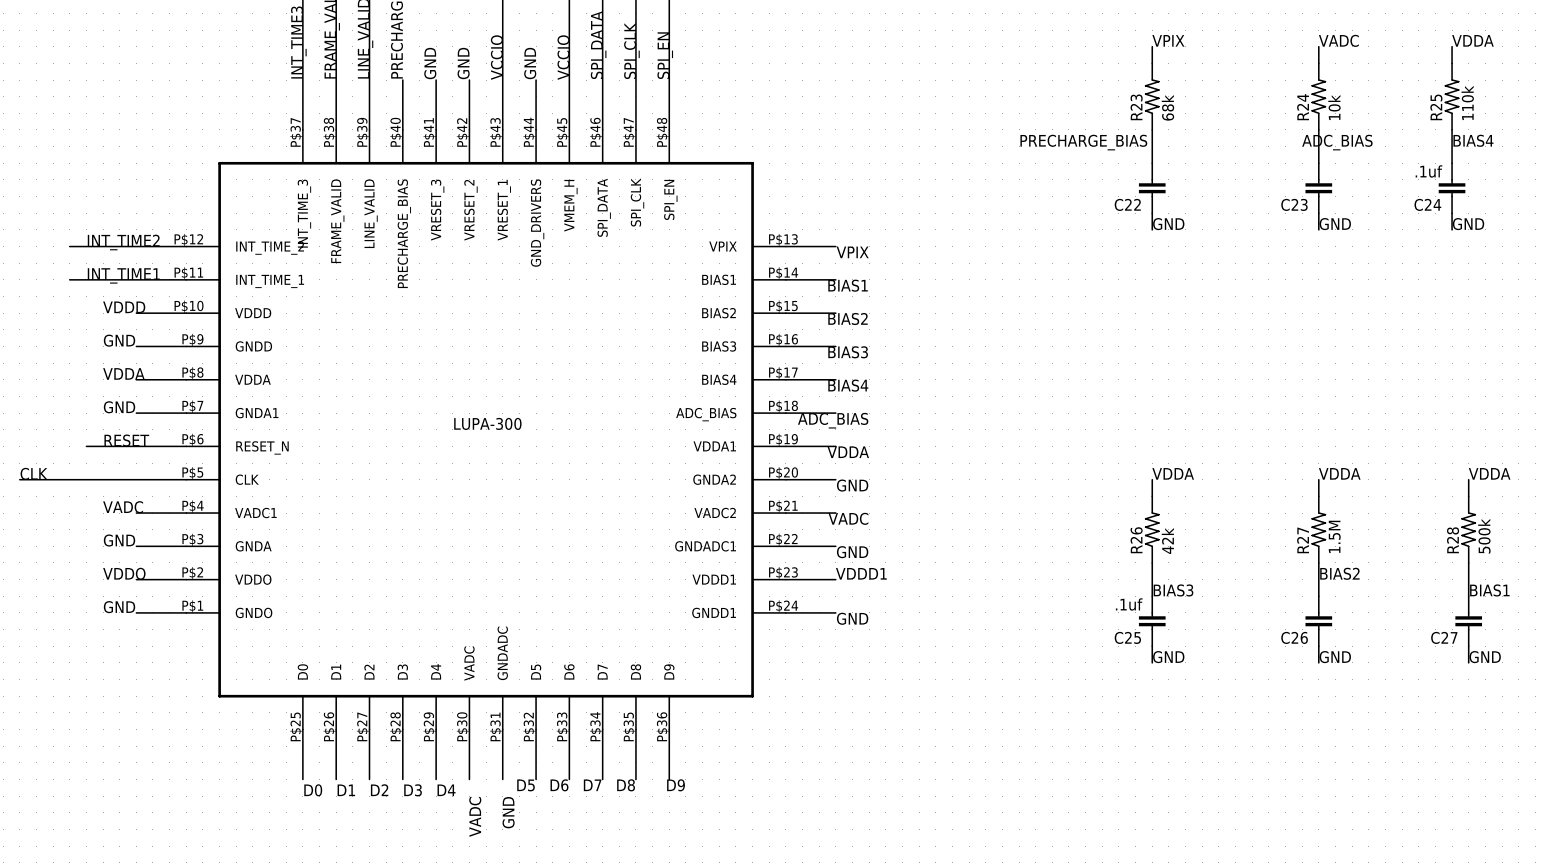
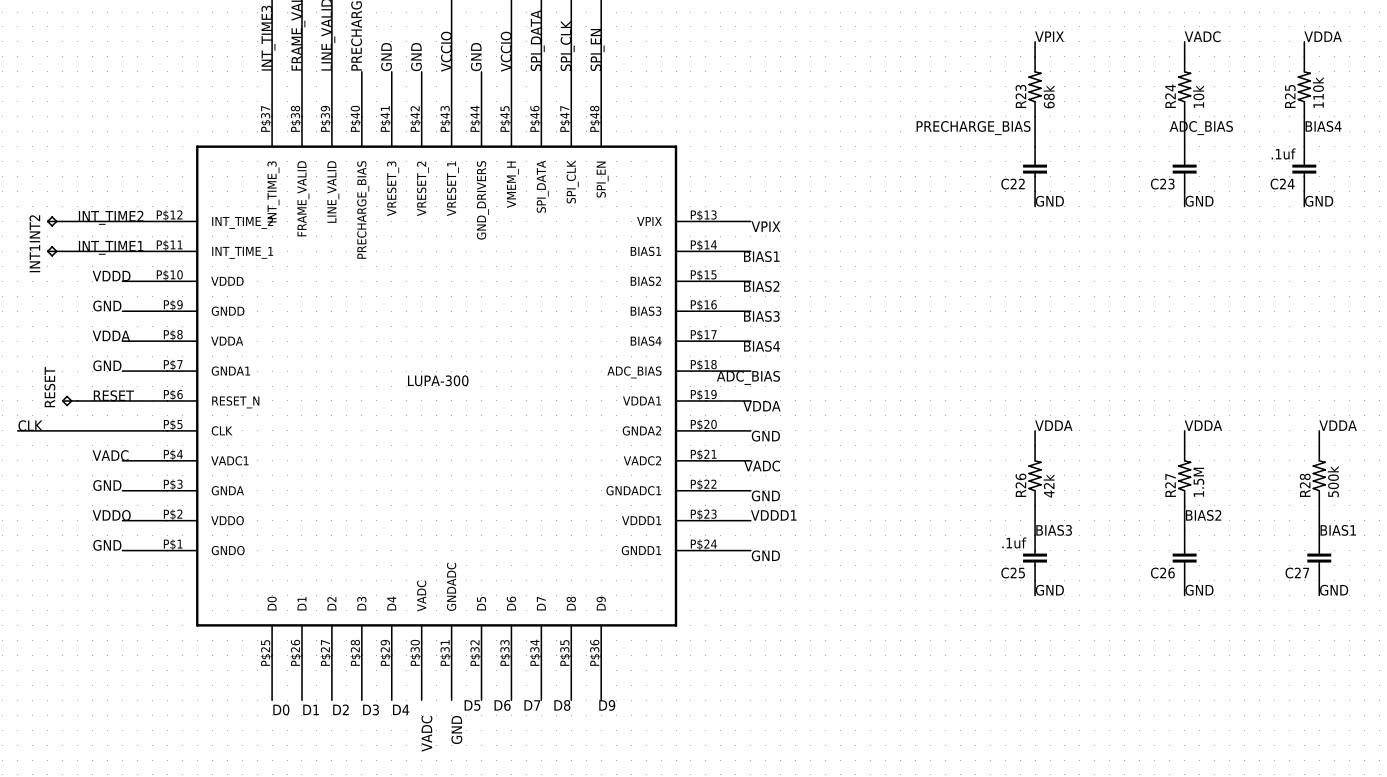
INT2: none -> (54, 221)
INT1: none -> (54, 251)
RESET: none -> (69, 400)

